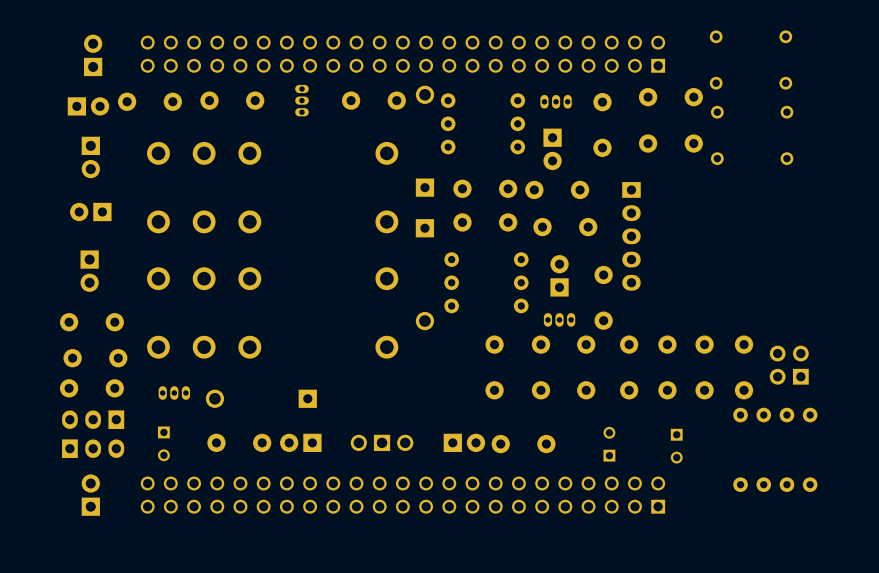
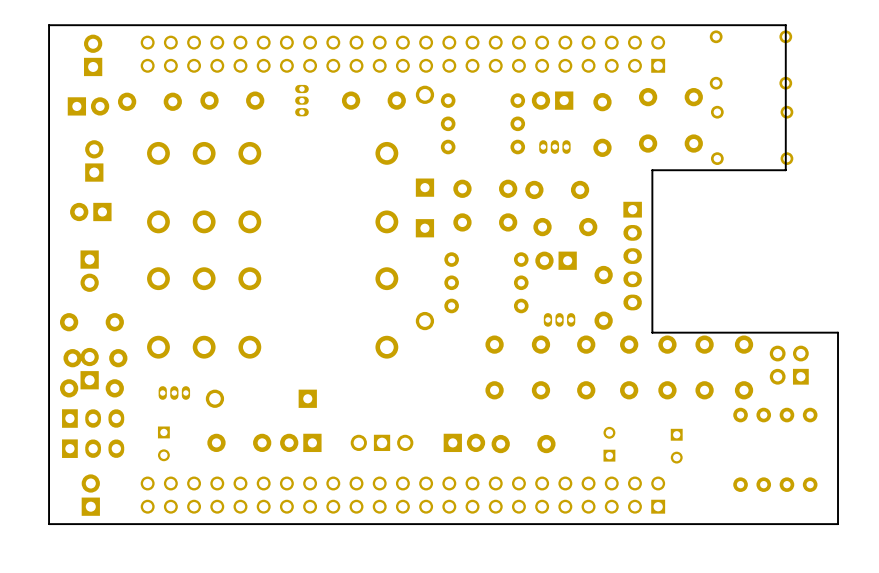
board edge: none -> (785, 25) (49, 25) (49, 524) (838, 524) (838, 332) (652, 332) (652, 170) (785, 170) (785, 25)
part footprint: [540, 94, 572, 109] -> [531, 91, 574, 110]
part footprint: [543, 128, 562, 171] -> [539, 140, 571, 154]
part rotation: 0° (90, 157) -> 180° (94, 160)
part position: (631, 236) -> (632, 256)
part rotation: 0° (559, 275) -> 90° counterclockwise (556, 260)
part: none -> (89, 368)
part rotation: 0° (93, 419) -> 180° (93, 418)

